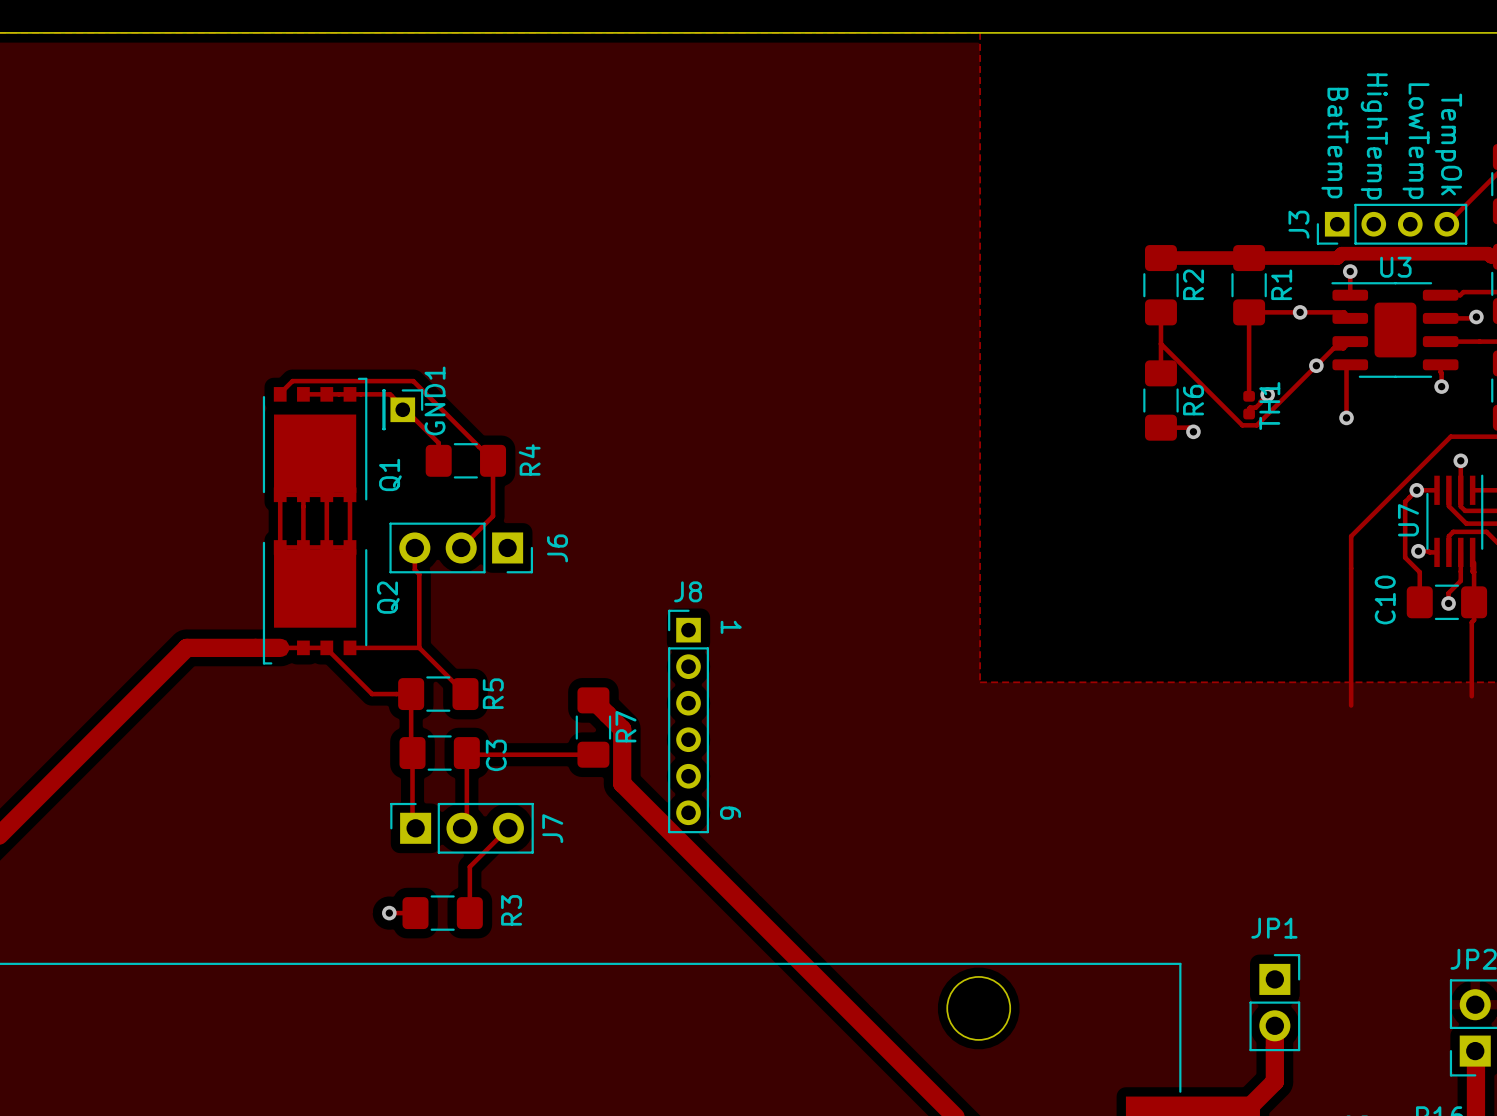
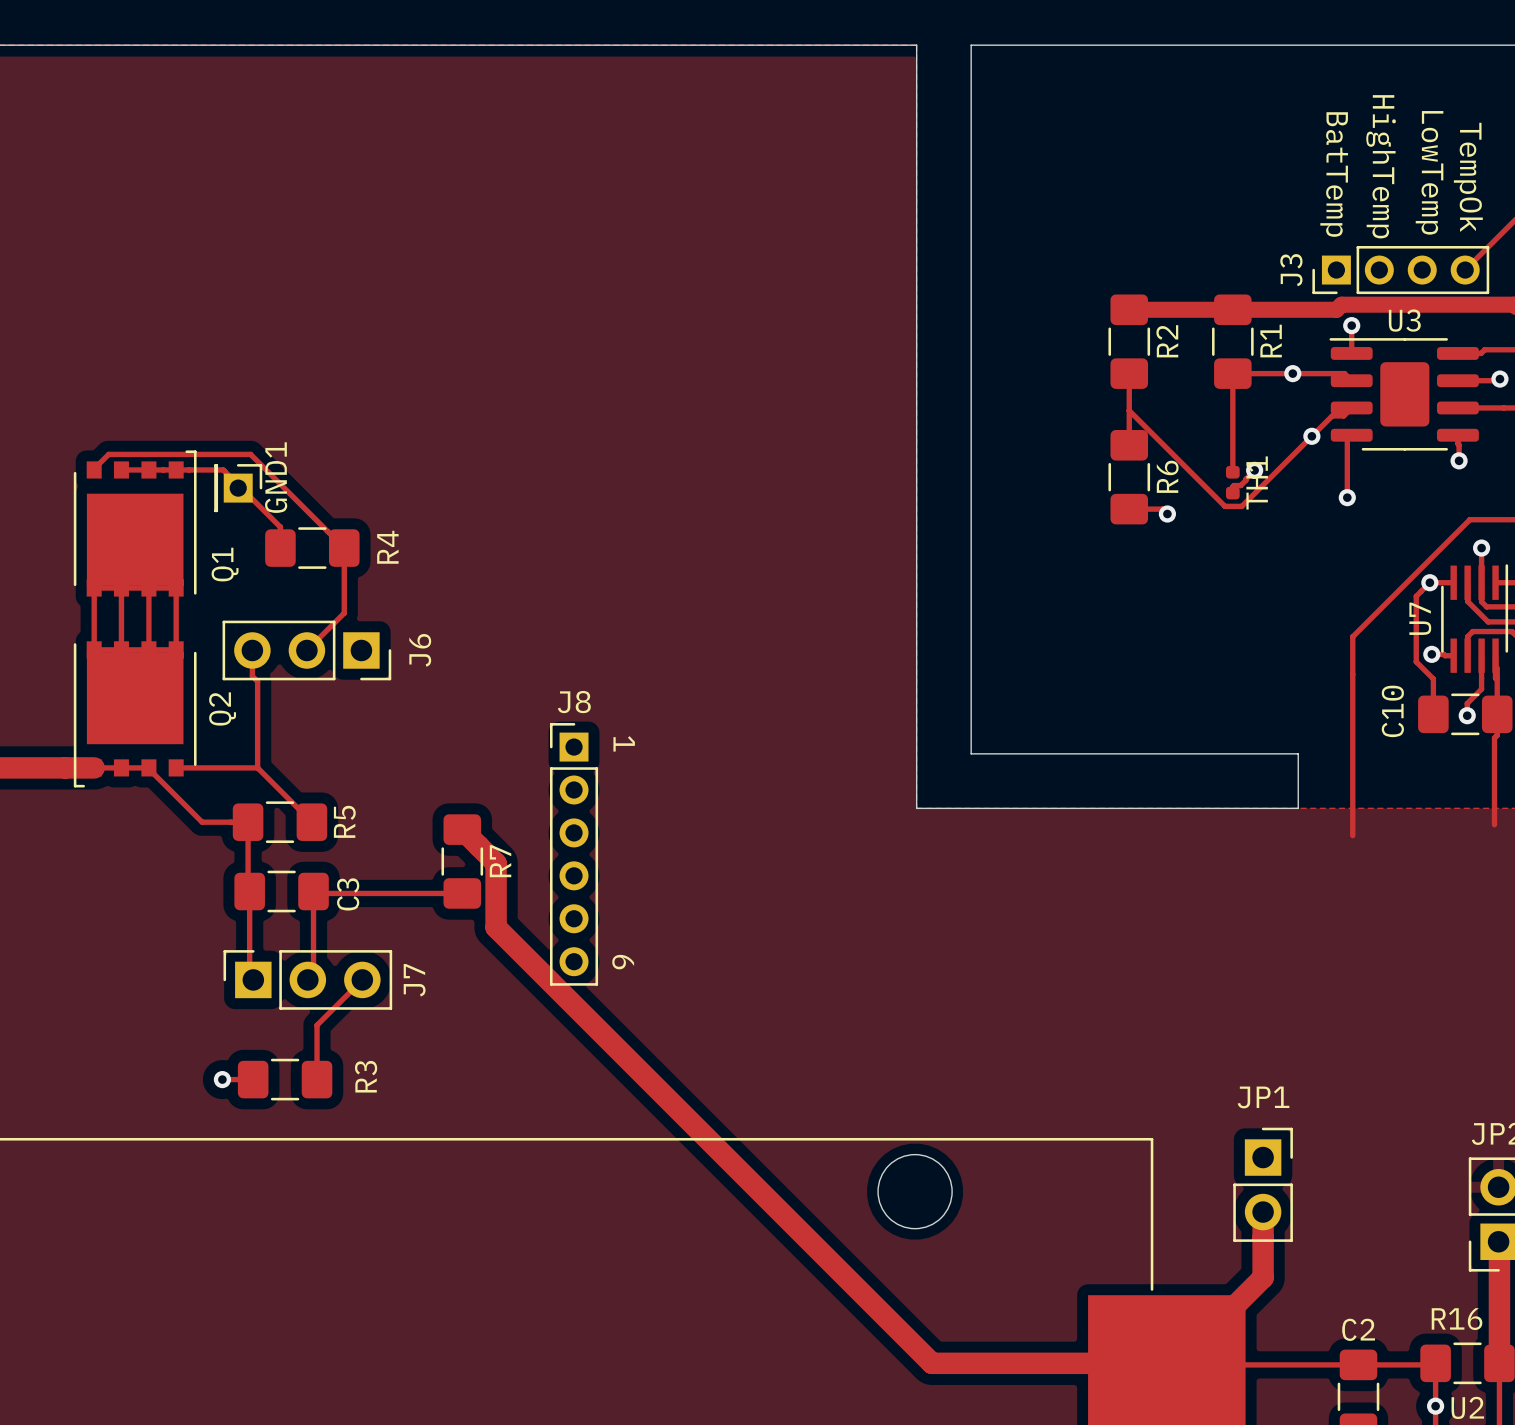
board edge: (980, 32) (1026, 32) -> (916, 45) (916, 808) (1298, 808) (1298, 753) (971, 753) (971, 45)

